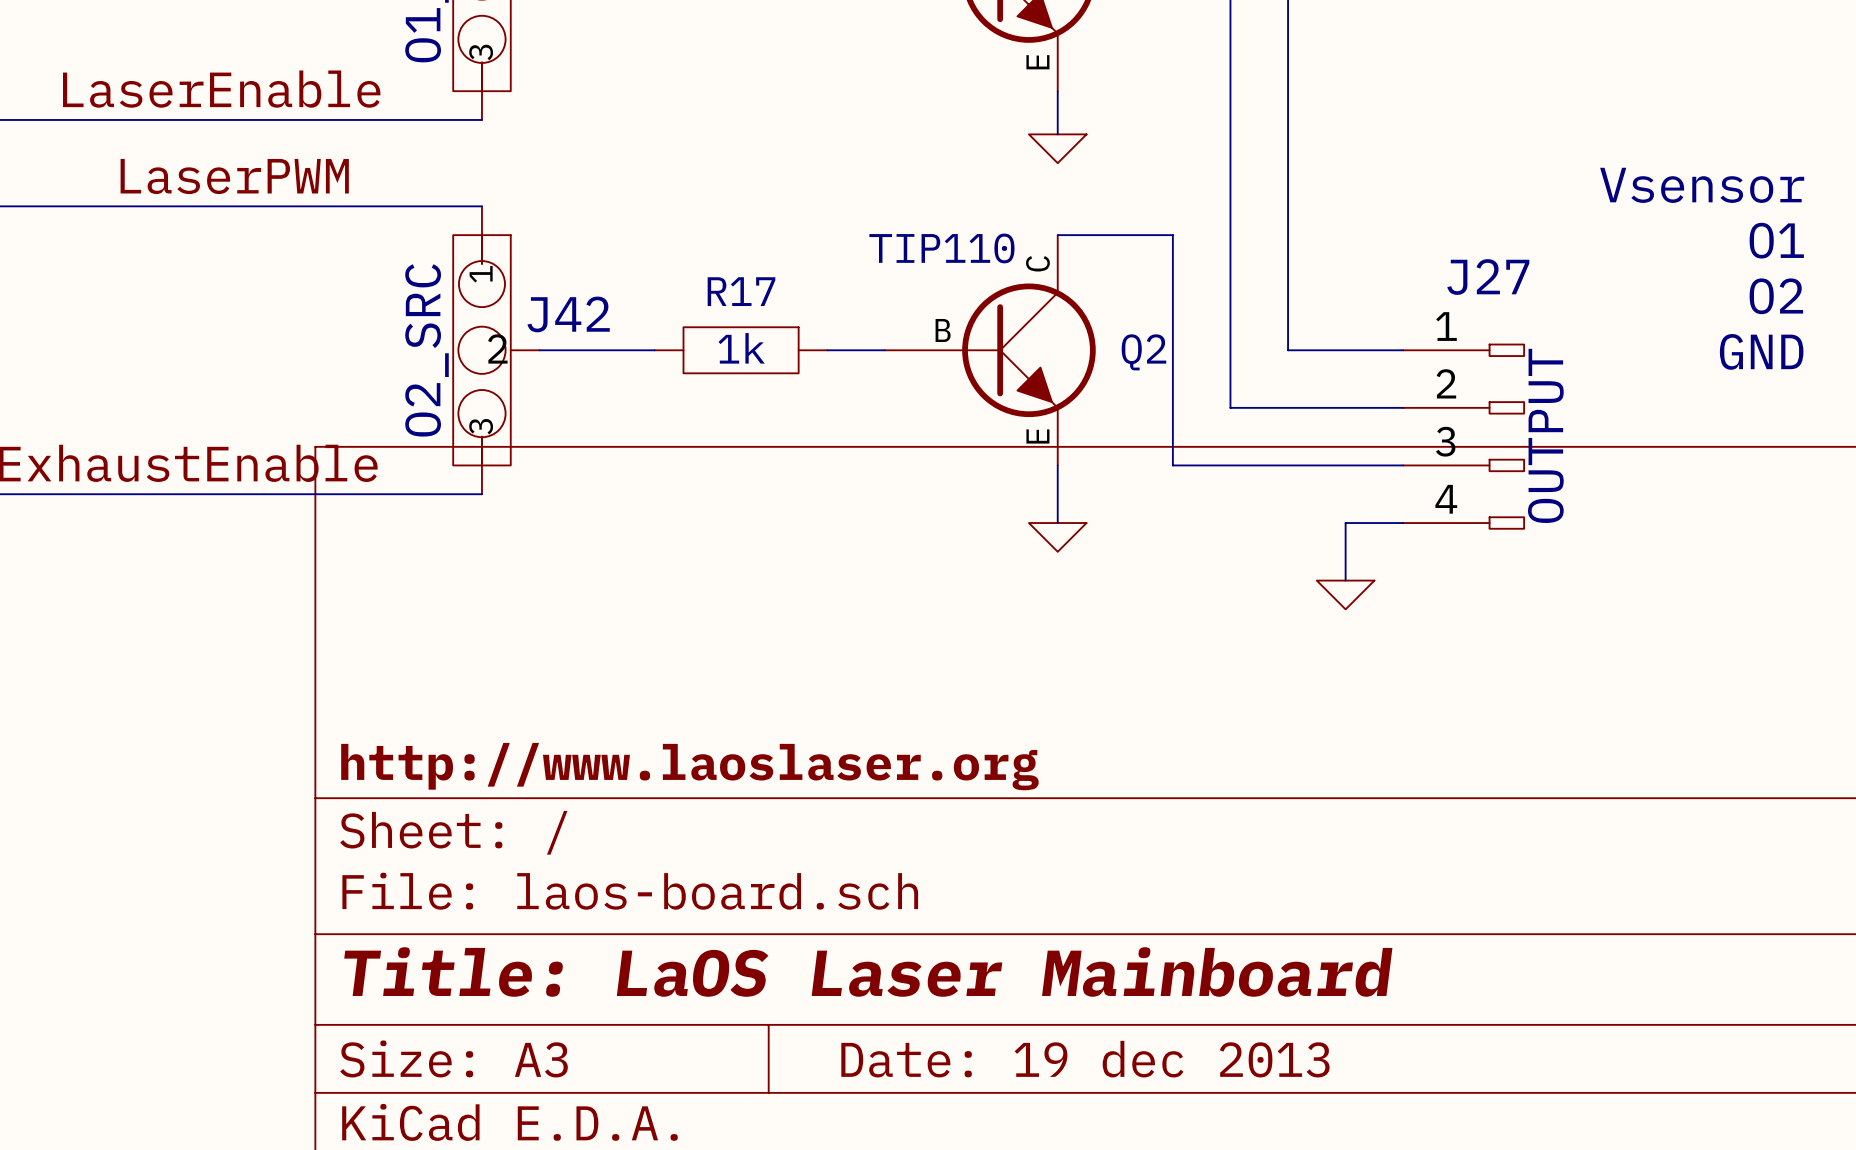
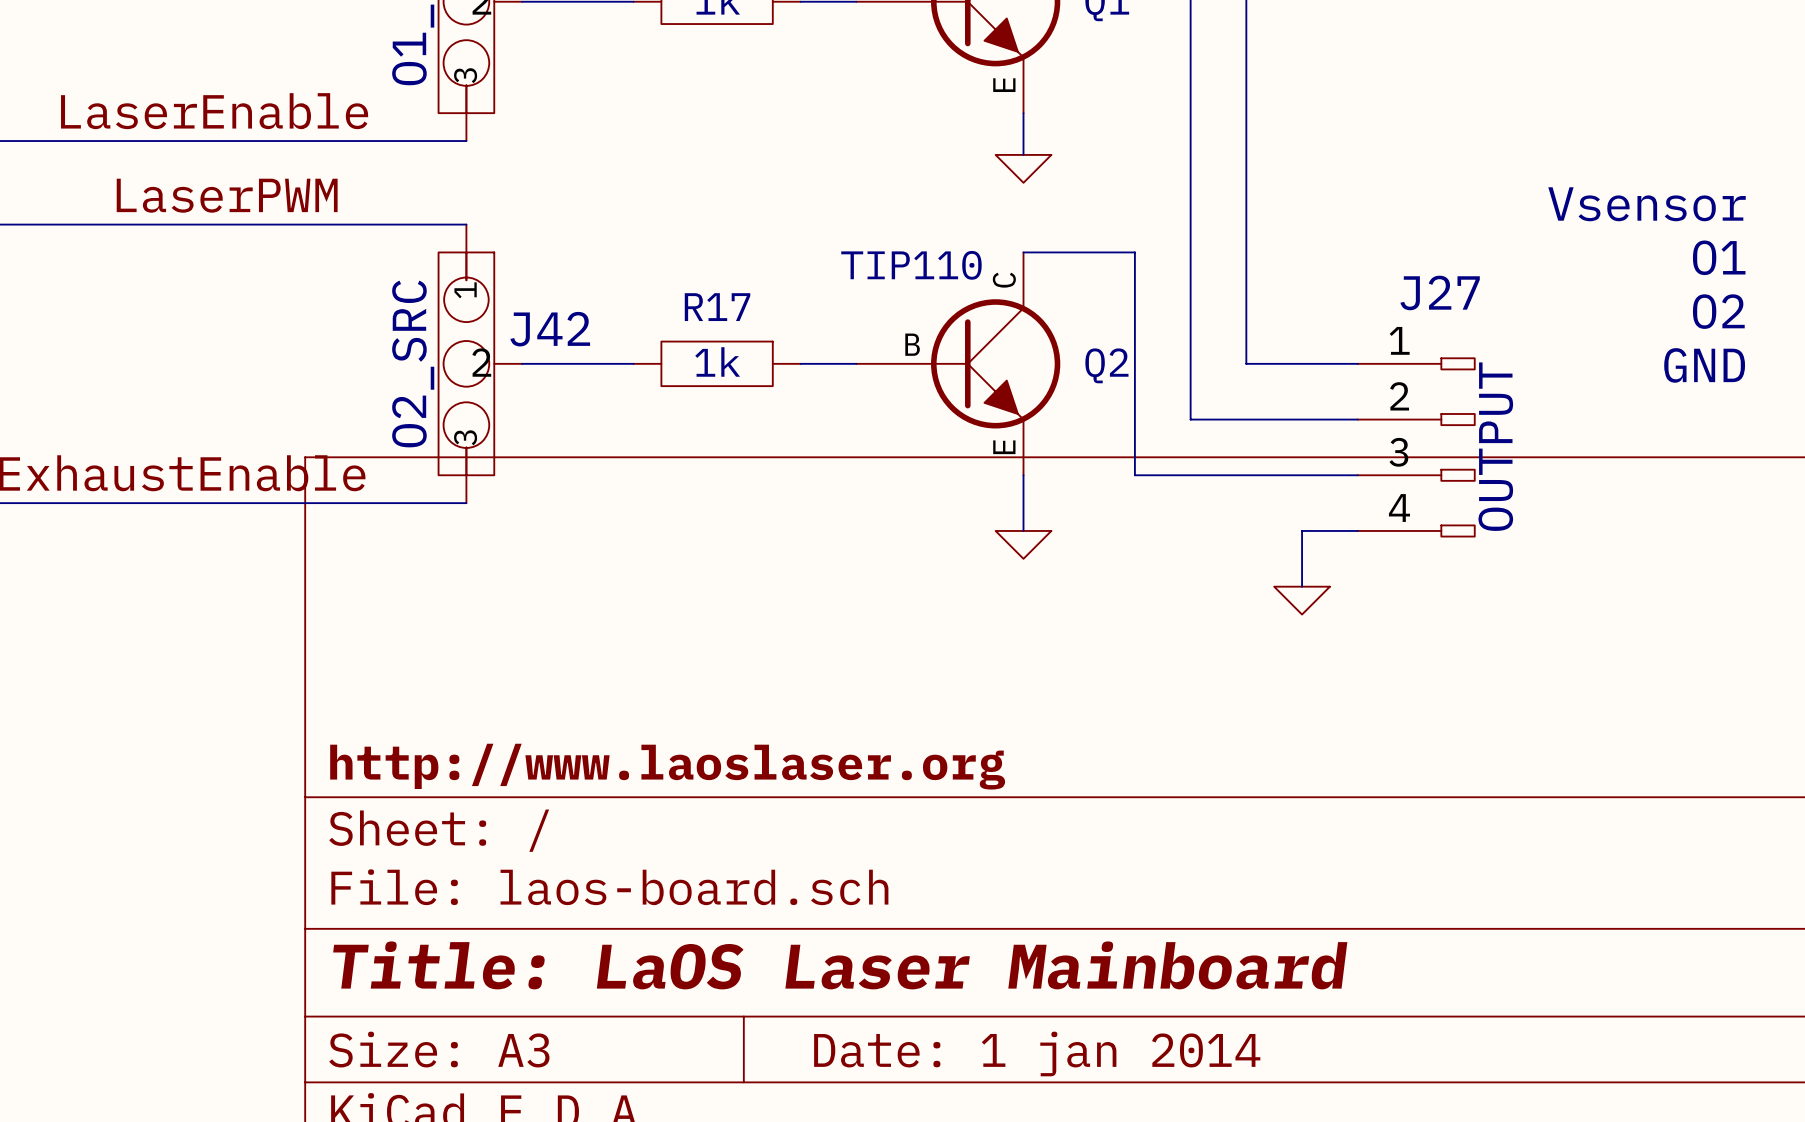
title block: Date: 19 dec 2013 (1085, 1059) -> Date: 1 jan 2014 (1037, 1053)

